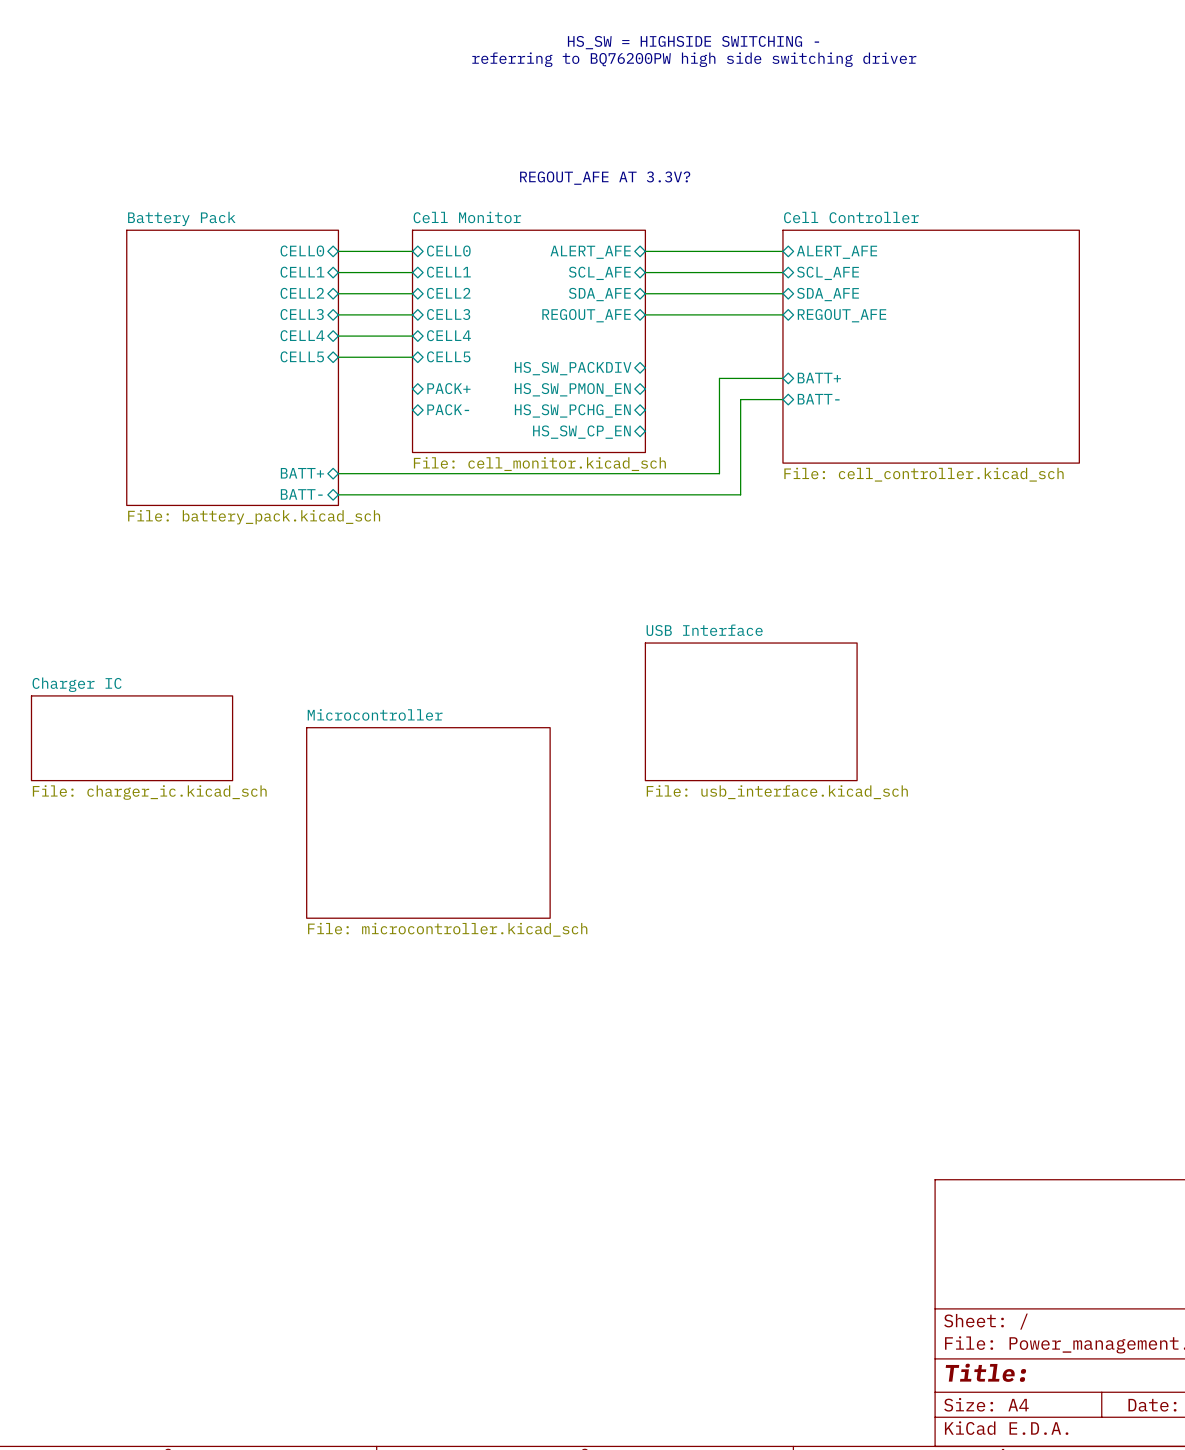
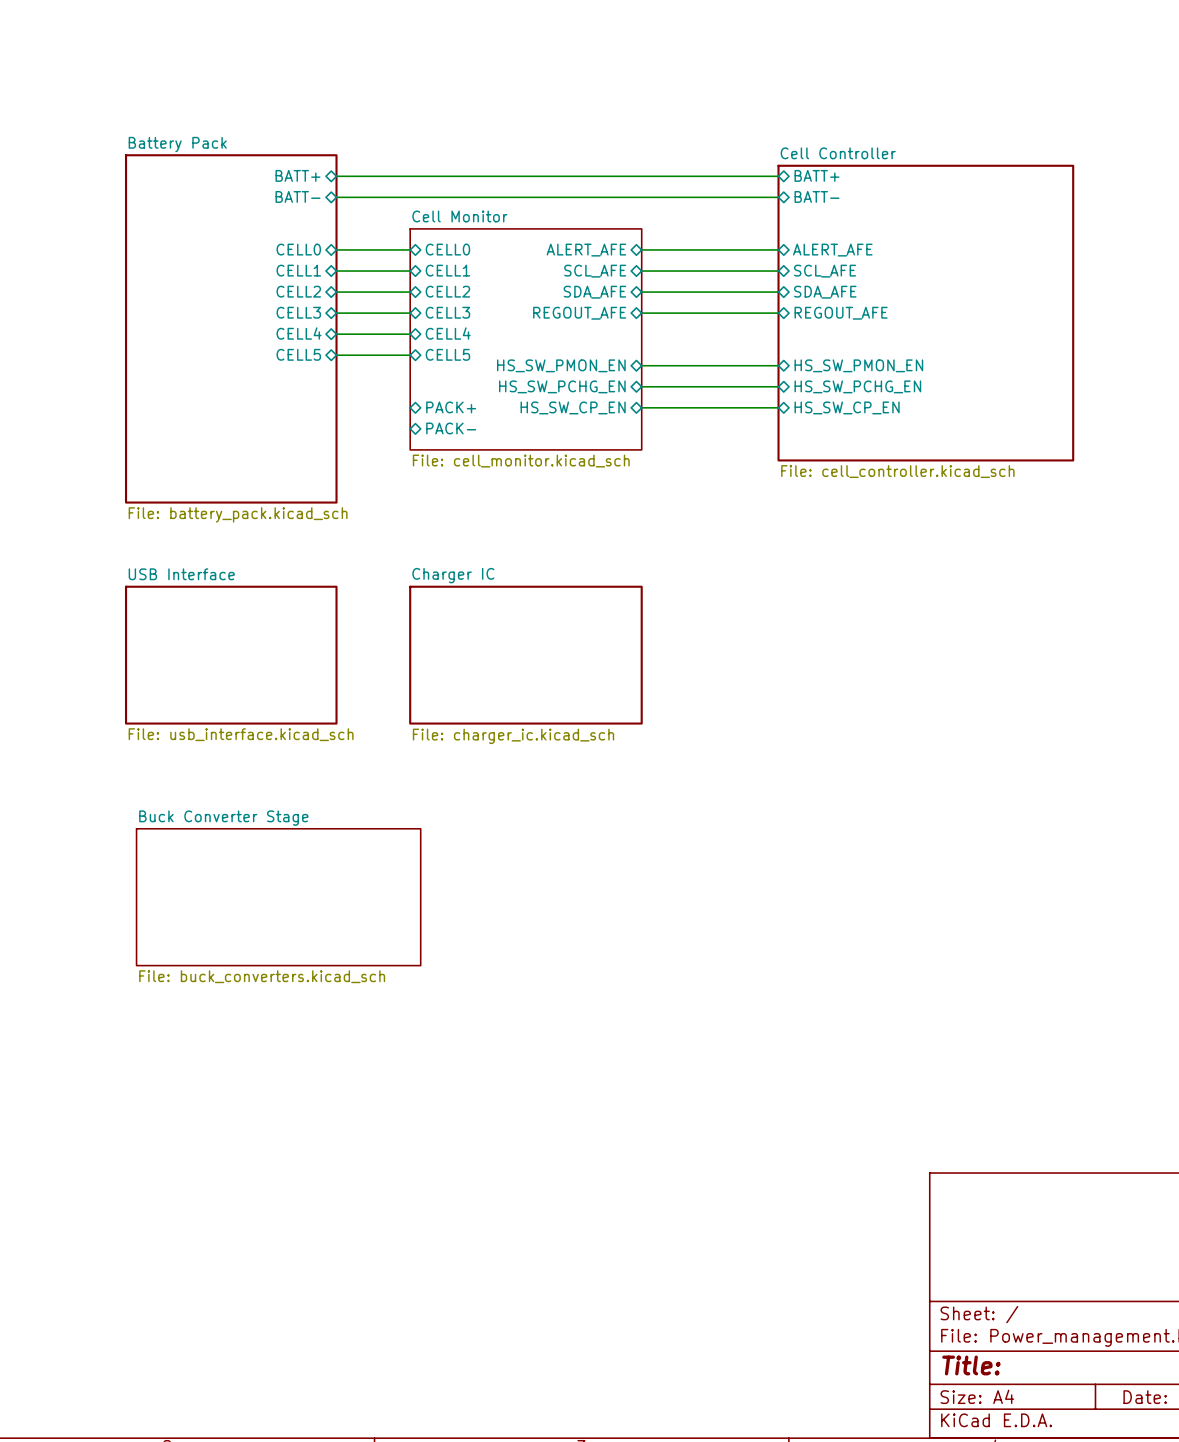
text: HS_SW = HIGHSIDE SWITCHING - (693, 42) -> none
text: referring to BQ76200PW high side switching driver (694, 59) -> none
sheet pin: none -> BATT+ (298, 175)
wire: none -> (336, 176) (778, 176)
text: REGOUT_AFE AT 3.3V? (605, 178) -> none
sheet pin: none -> BATT- (298, 196)
wire: none -> (336, 197) (778, 197)
sheet Cell Controller: none -> File: cell_controller.kicad_sch (925, 313)
sheet Battery Pack: none -> File: battery_pack.kicad_sch (231, 328)
sheet Cell Controller: File: cell_controller.kicad_sch (931, 346) -> none
sheet Battery Pack: File: battery_pack.kicad_sch (232, 367) -> none
wire: none -> (641, 365) (778, 365)
sheet pin: HS_SW_PACKDIV (573, 368) -> HS_SW_PMON_EN (561, 365)
sheet pin: none -> HS_SW_PMON_EN (858, 365)
wire: (782, 378) (719, 378) (719, 473) (338, 473) -> none
sheet pin position: BATT+ (819, 378) -> BATT+ (817, 175)
sheet pin: PACK+ (448, 388) -> none
wire: none -> (641, 386) (778, 386)
sheet pin: HS_SW_PMON_EN (572, 389) -> HS_SW_PCHG_EN (562, 386)
sheet pin: none -> HS_SW_PCHG_EN (857, 386)
wire: (782, 399) (740, 399) (740, 494) (338, 494) -> none
sheet pin position: BATT- (818, 399) -> BATT- (817, 196)
sheet pin: PACK- (448, 409) -> PACK+ (451, 407)
sheet pin: HS_SW_PCHG_EN (572, 410) -> HS_SW_CP_EN (573, 407)
wire: none -> (641, 407) (778, 407)
sheet pin: none -> PACK- (451, 428)
sheet pin rotation: 0° (581, 432) -> 180° (847, 407)
sheet pin position: HS_SW_CP_EN (581, 432) -> HS_SW_CP_EN (847, 407)
sheet pin: BATT+ (302, 473) -> none
sheet pin: BATT- (301, 494) -> none
sheet USB Interface: none -> File: usb_interface.kicad_sch (231, 655)
sheet Charger IC: none -> File: charger_ic.kicad_sch (525, 655)
sheet USB Interface: File: usb_interface.kicad_sch (751, 711) -> none
sheet Charger IC: File: charger_ic.kicad_sch (132, 738) -> none
sheet Microcontroller: File: microcontroller.kicad_sch (428, 822) -> none
sheet Buck Converter Stage: none -> File: buck_converters.kicad_sch (278, 897)

